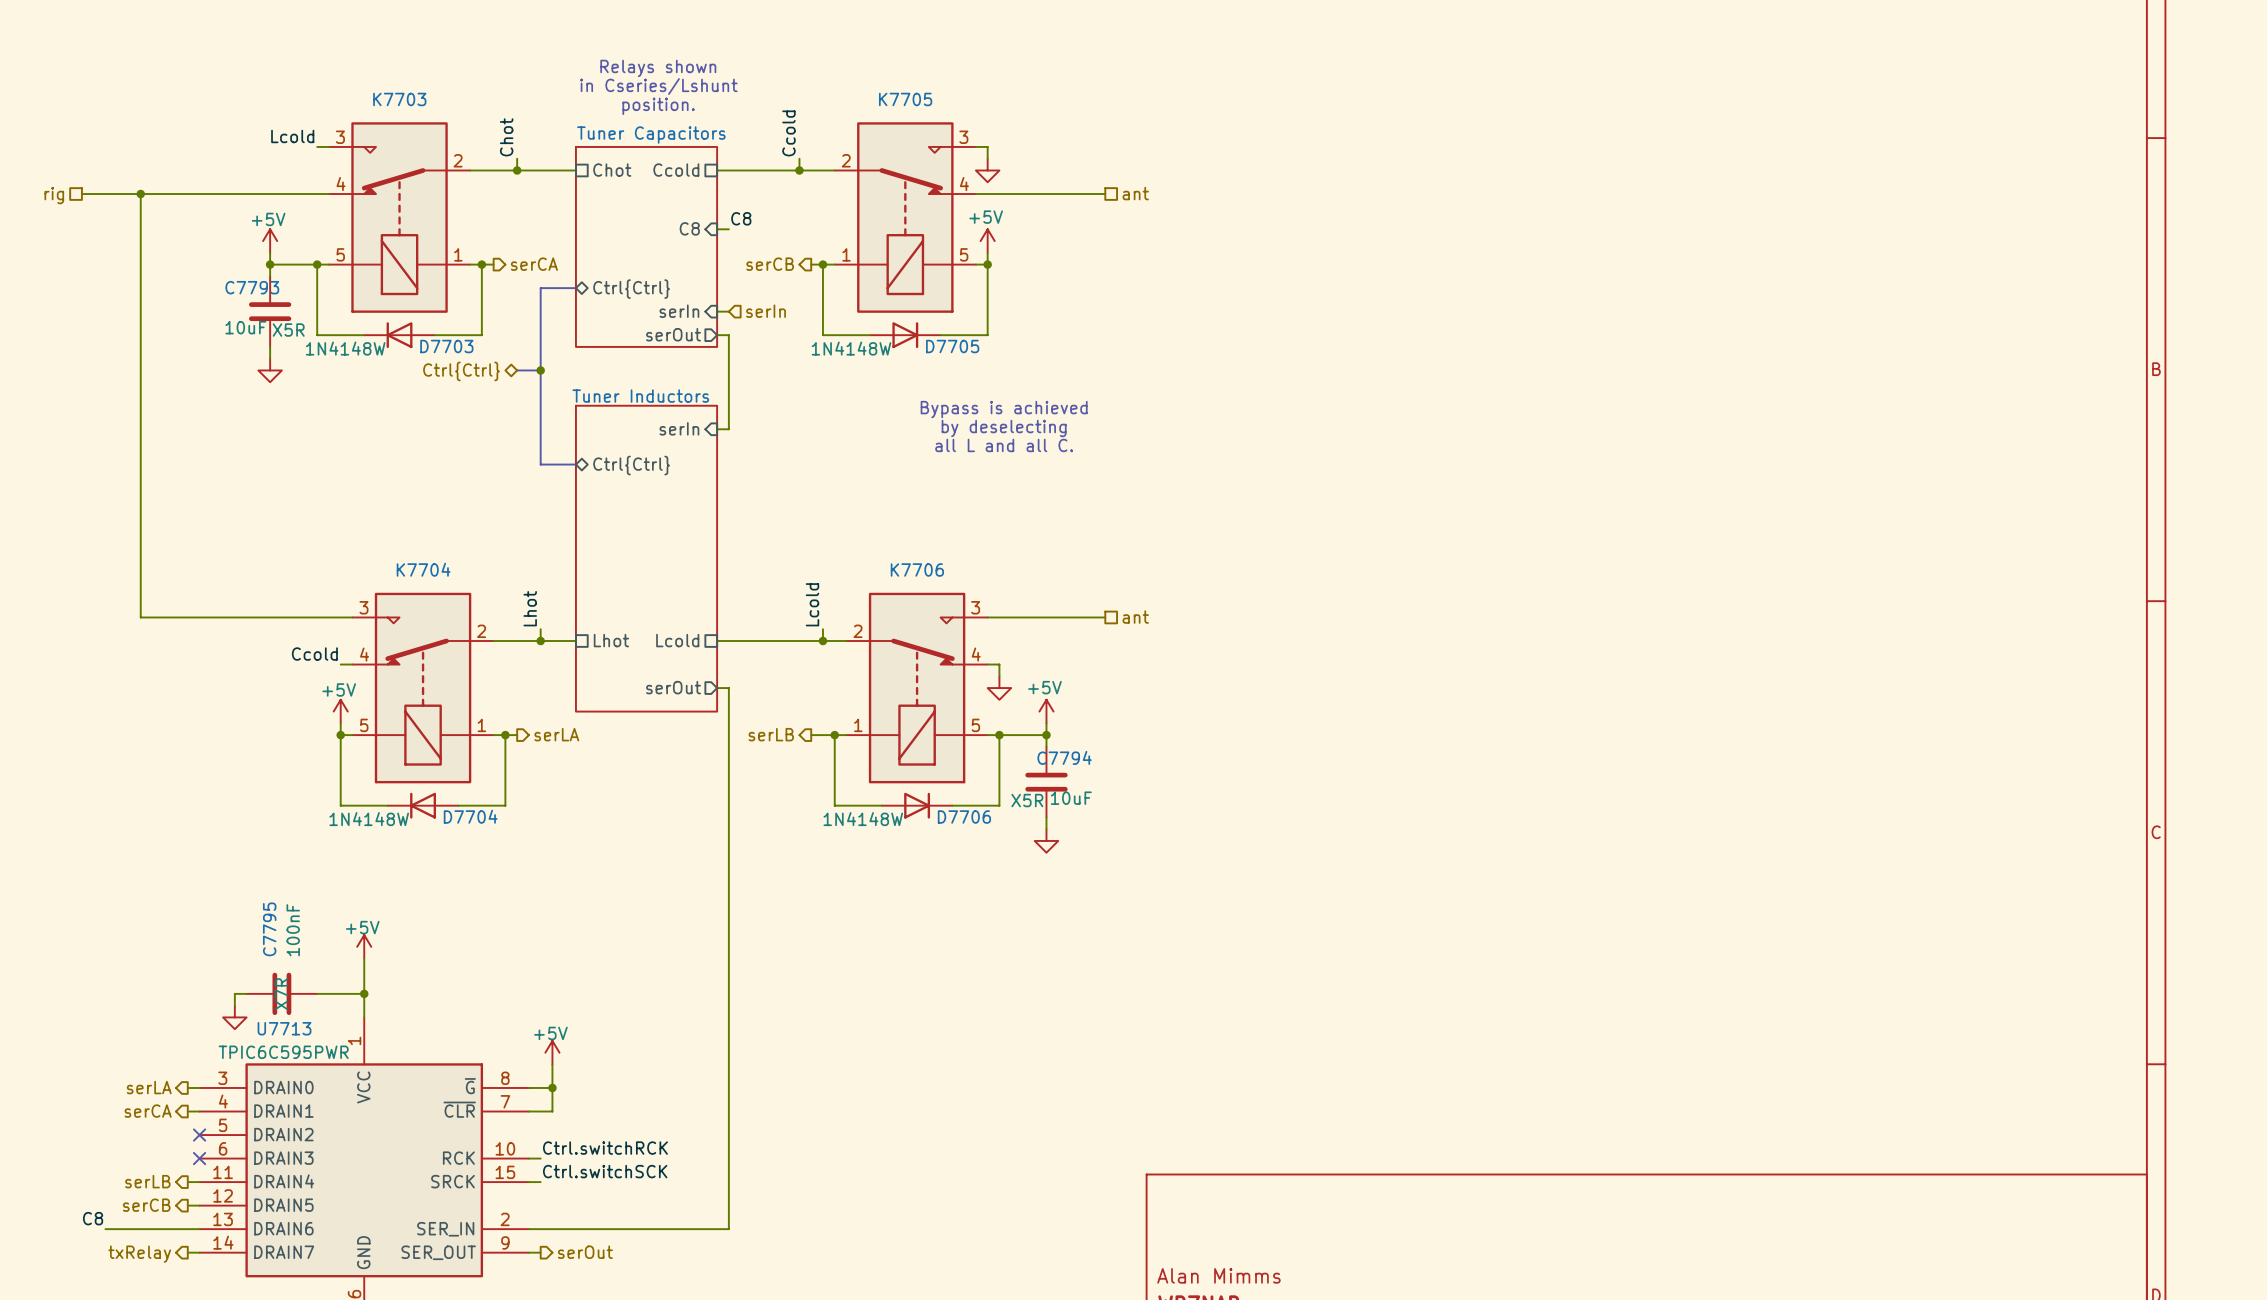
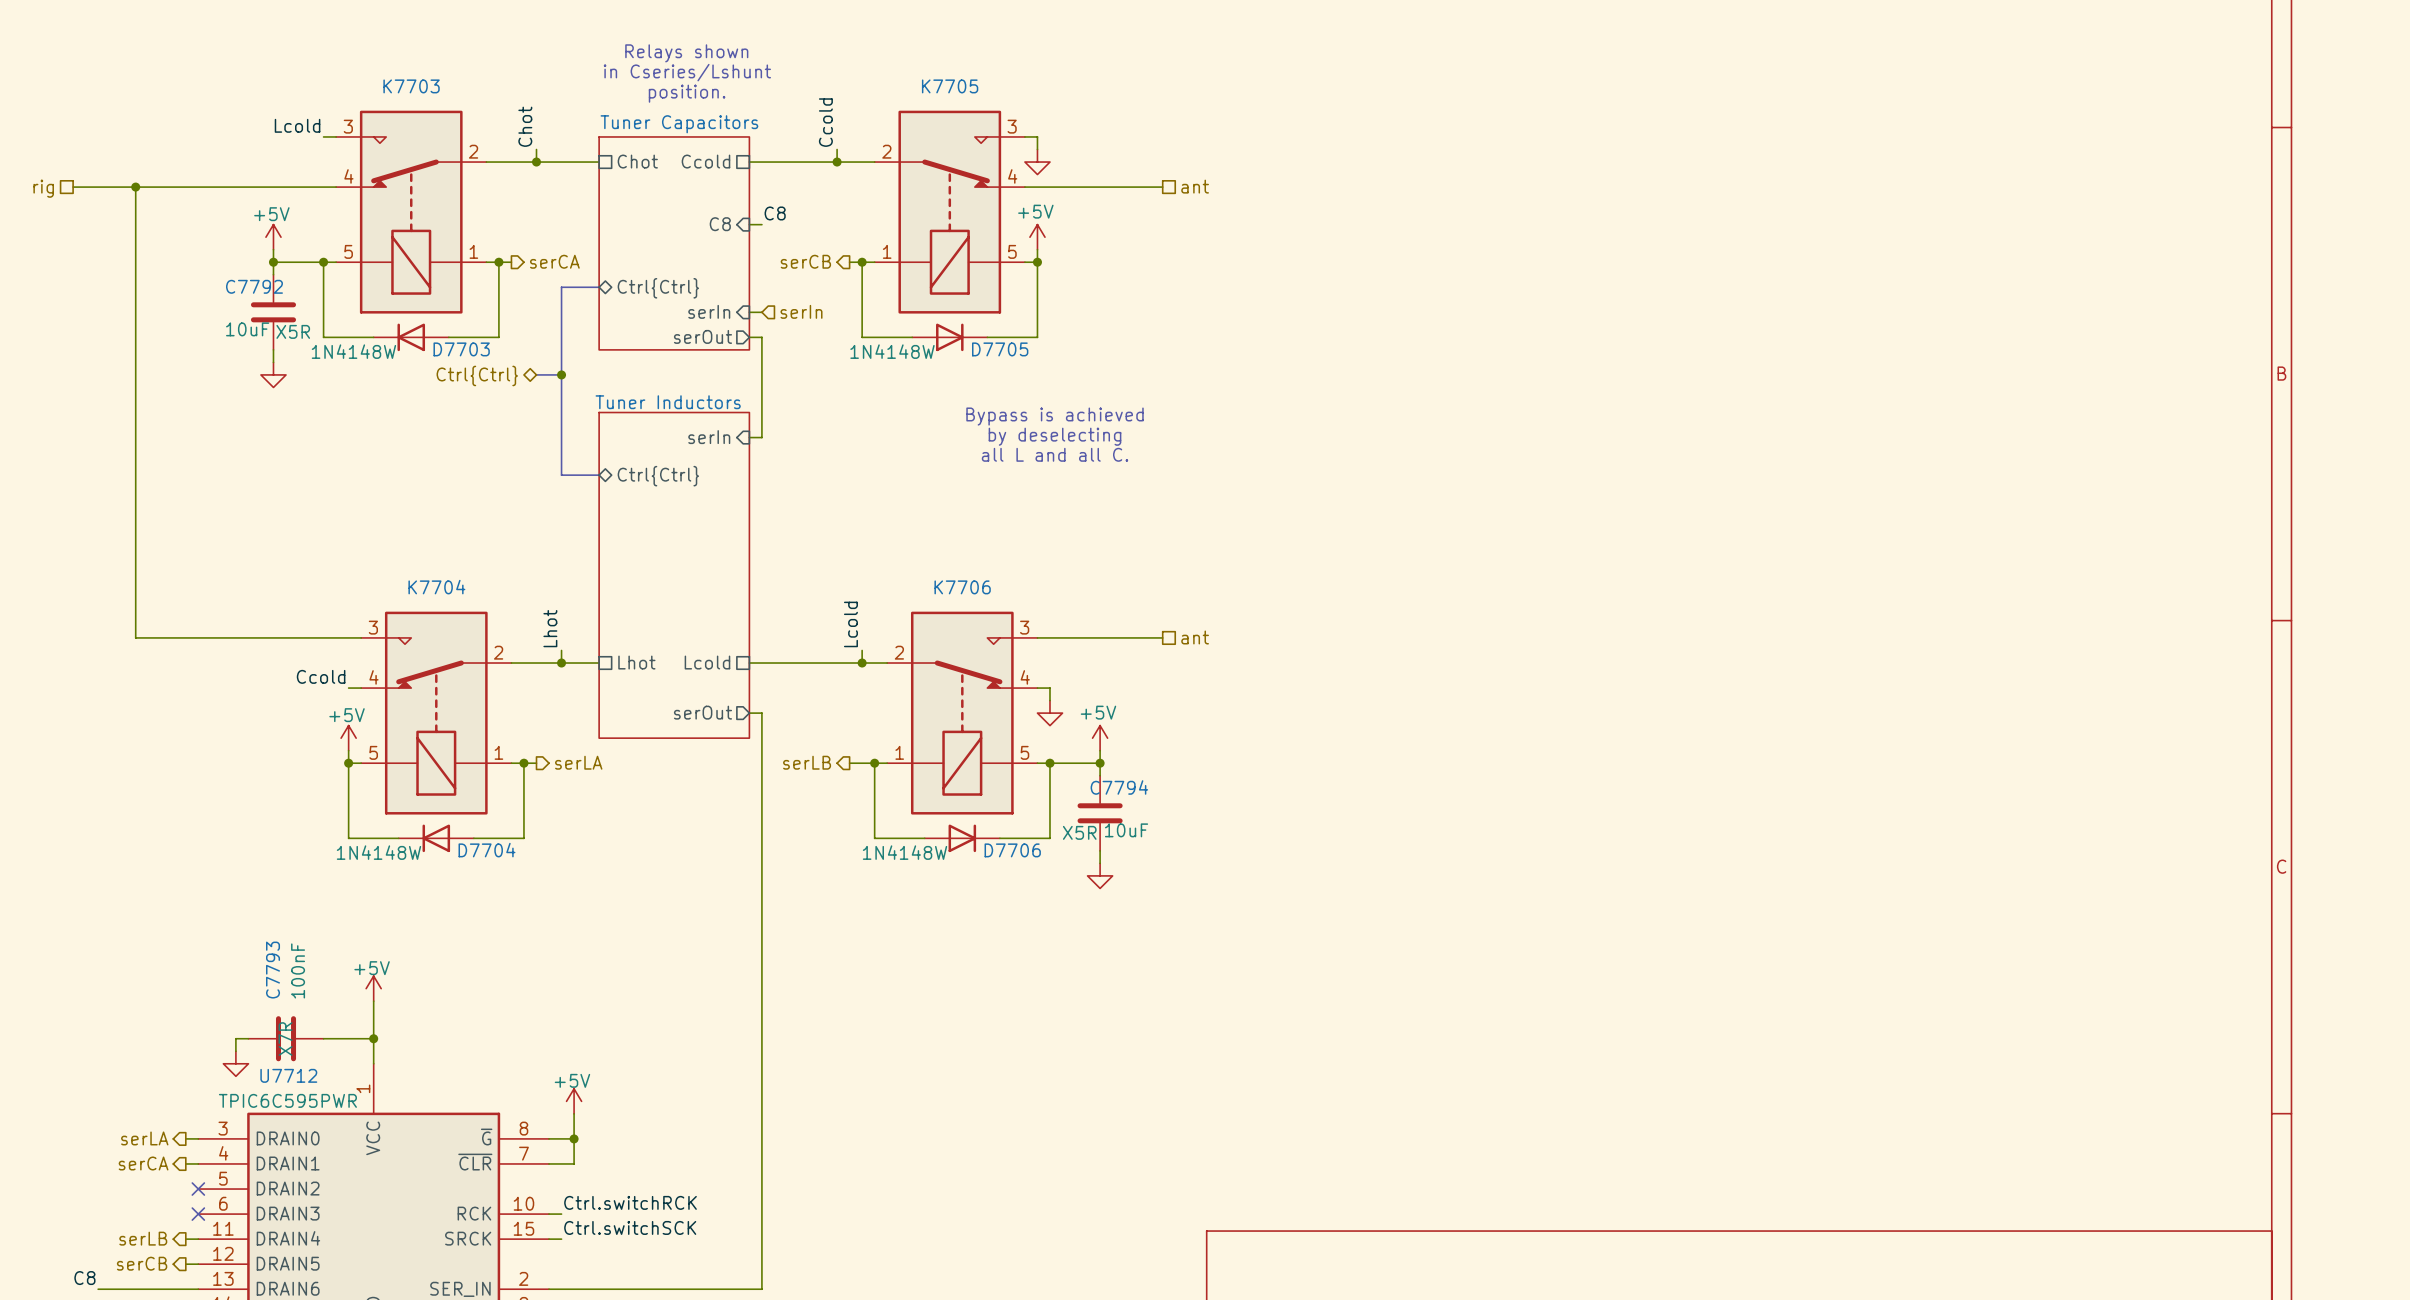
C7793 name: C7793 (252, 287) -> C7792 (254, 286)
C7795 name: C7795 (269, 929) -> C7793 (273, 970)
U7713 name: U7713 (284, 1028) -> U7712 (288, 1075)

